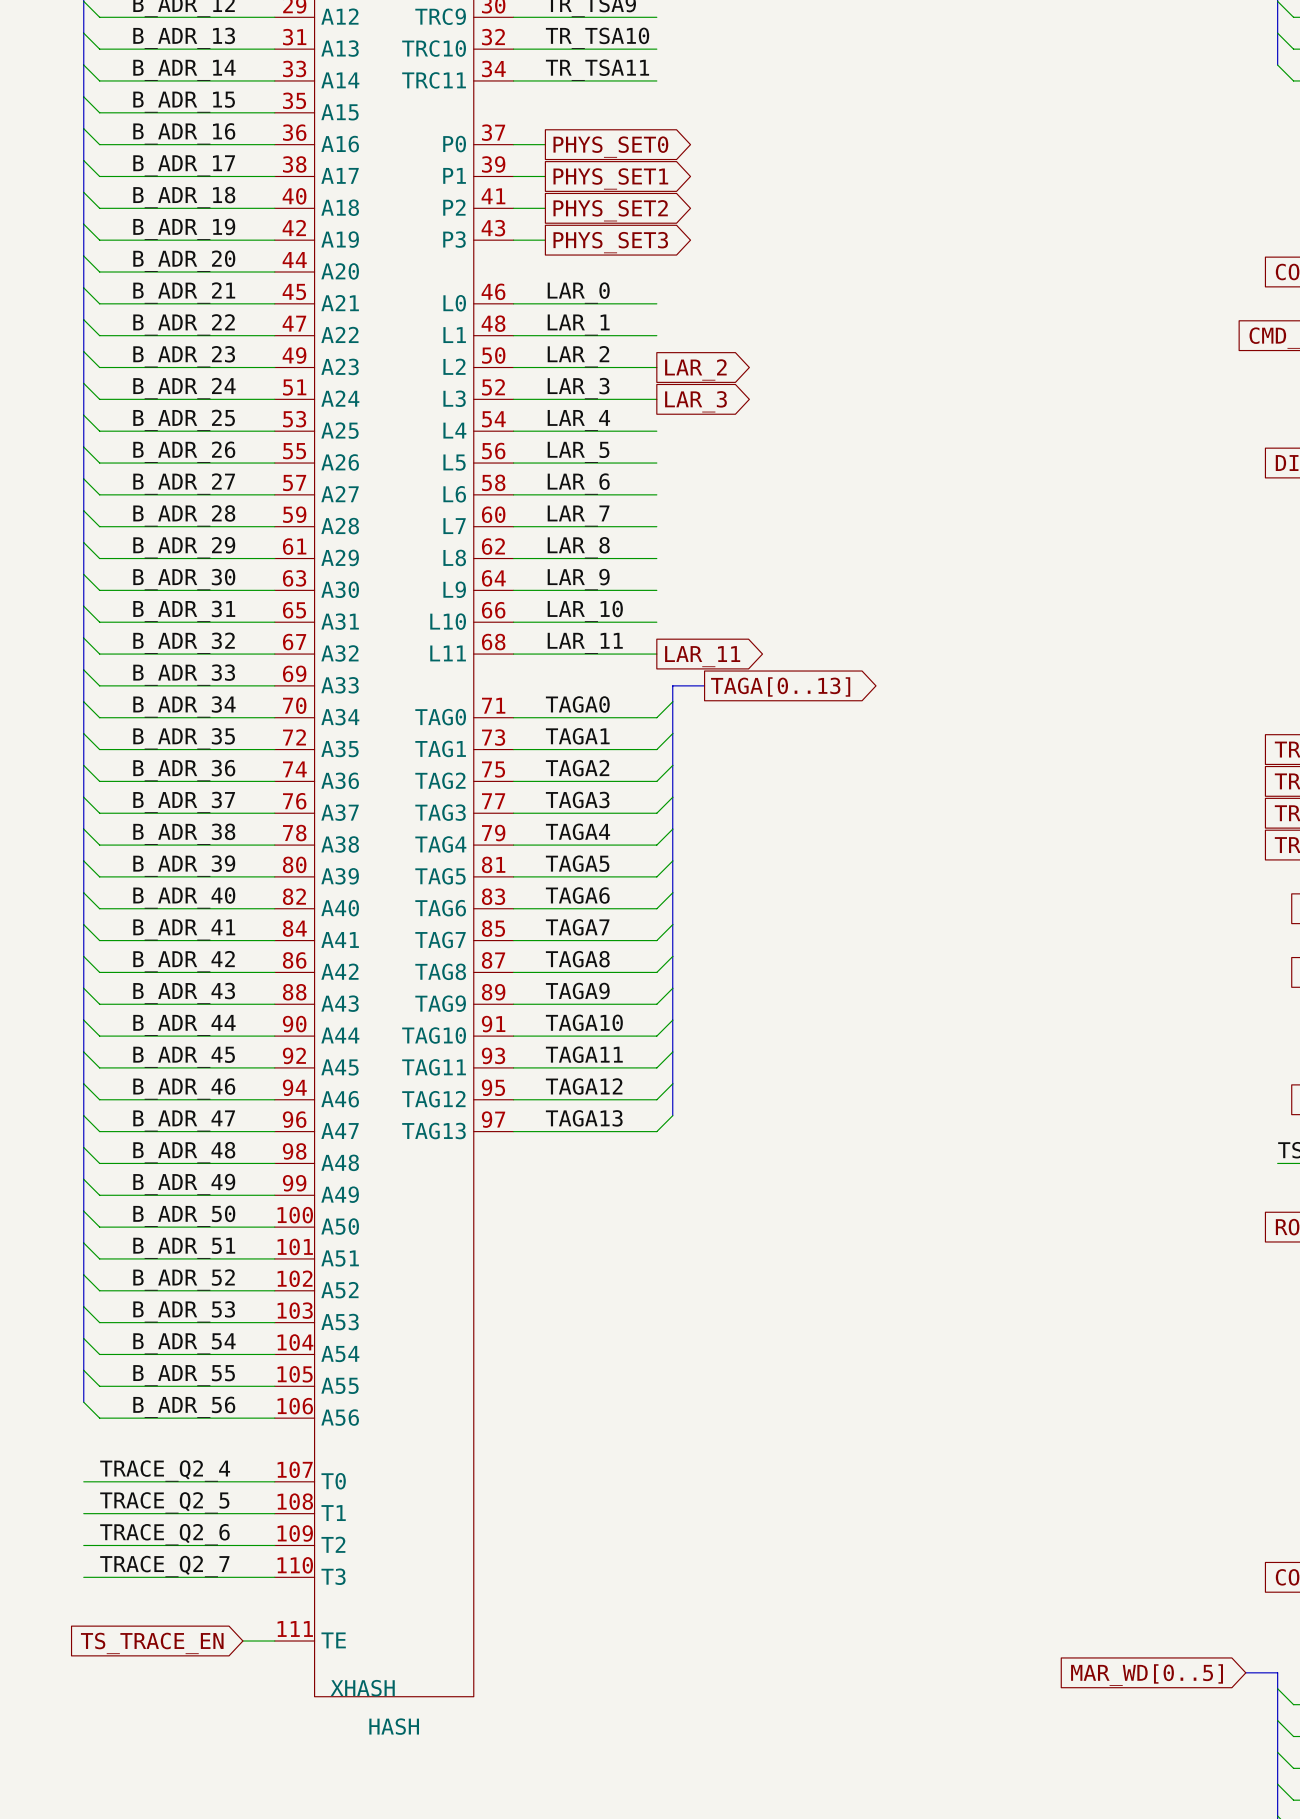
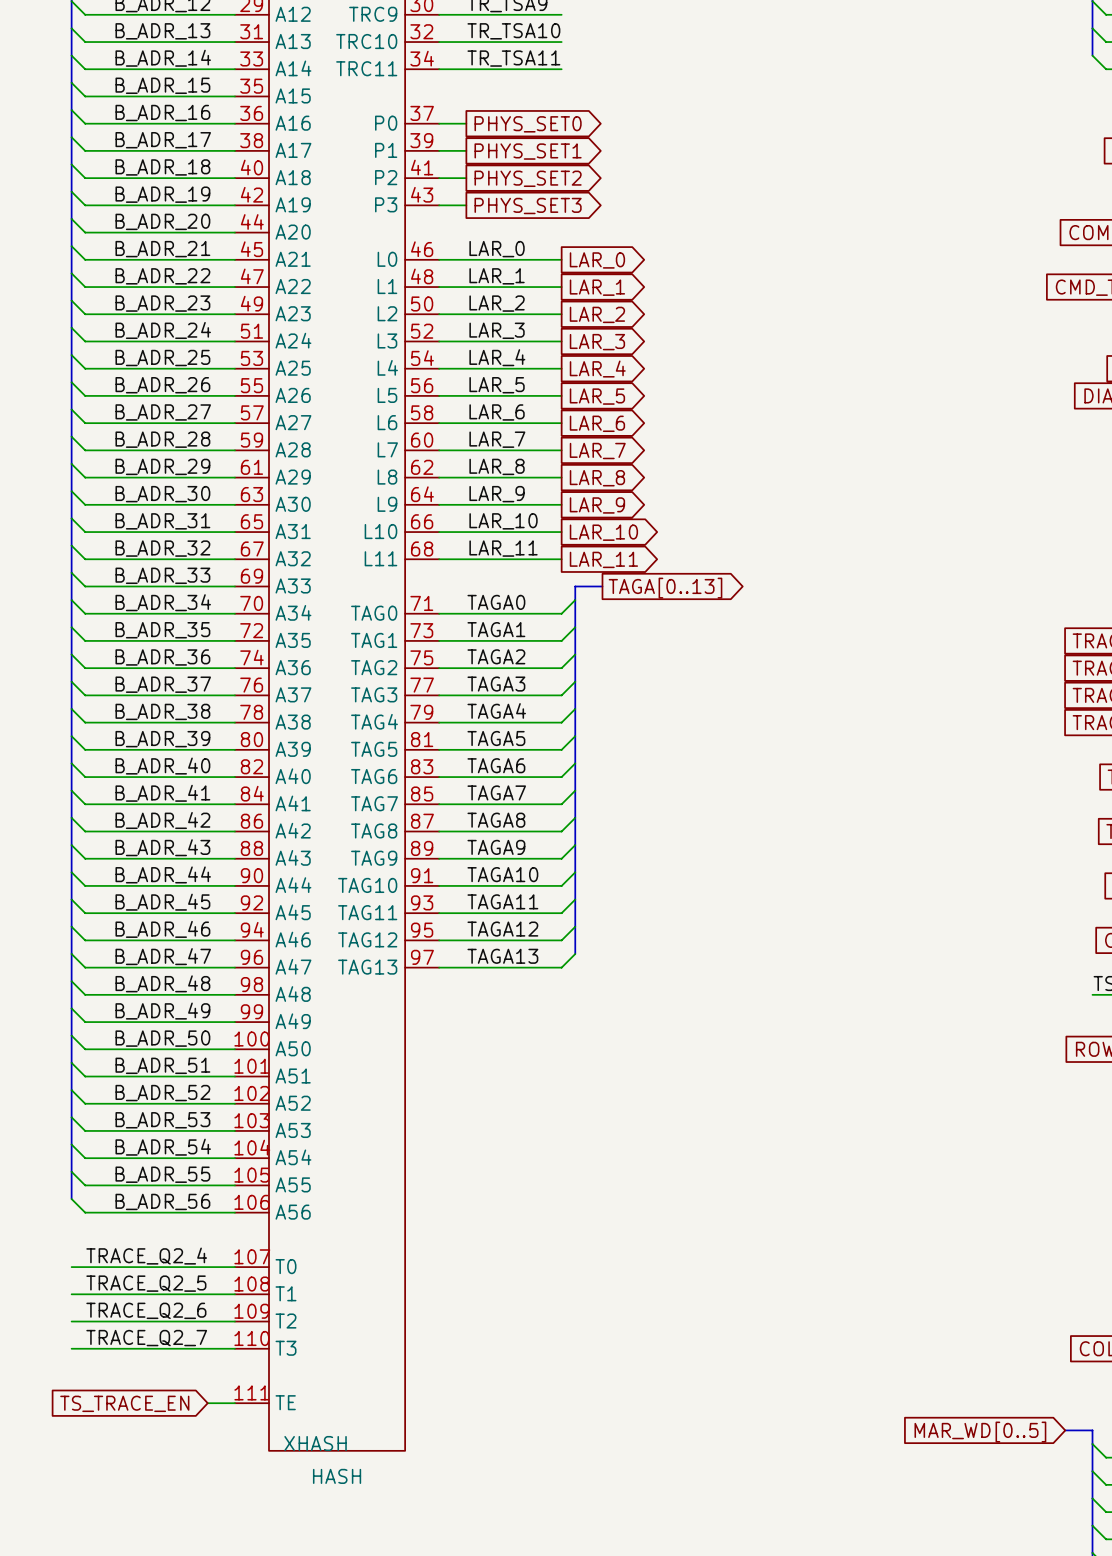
global label: none -> LAR_0 (597, 260)
global label: none -> LAR_1 (597, 287)
global label: none -> LAR_4 (597, 369)
global label: none -> LAR_5 (597, 396)
global label: none -> LAR_6 (597, 423)
global label: none -> LAR_7 (597, 451)
global label: none -> LAR_8 (597, 478)
global label: none -> LAR_9 (597, 505)
global label: none -> LAR_10 (603, 532)

